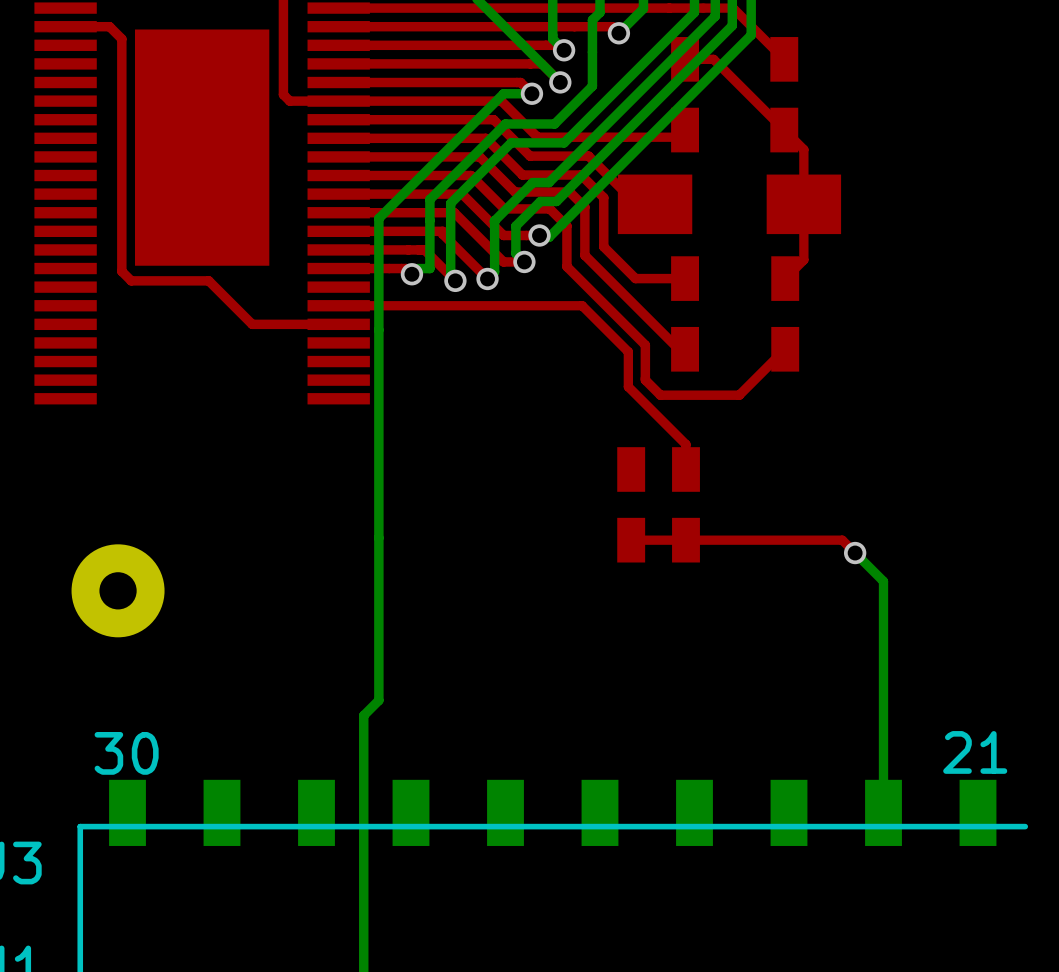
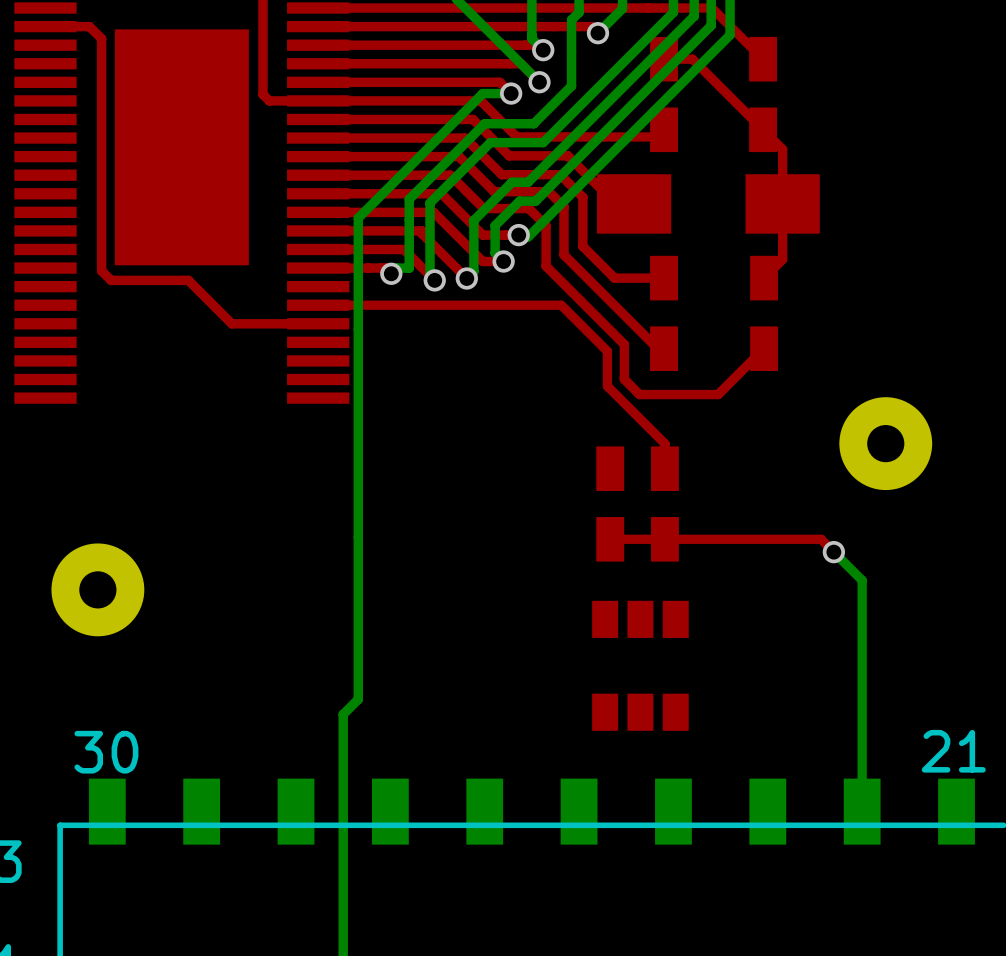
part: none -> (885, 443)
part: none -> (640, 665)

